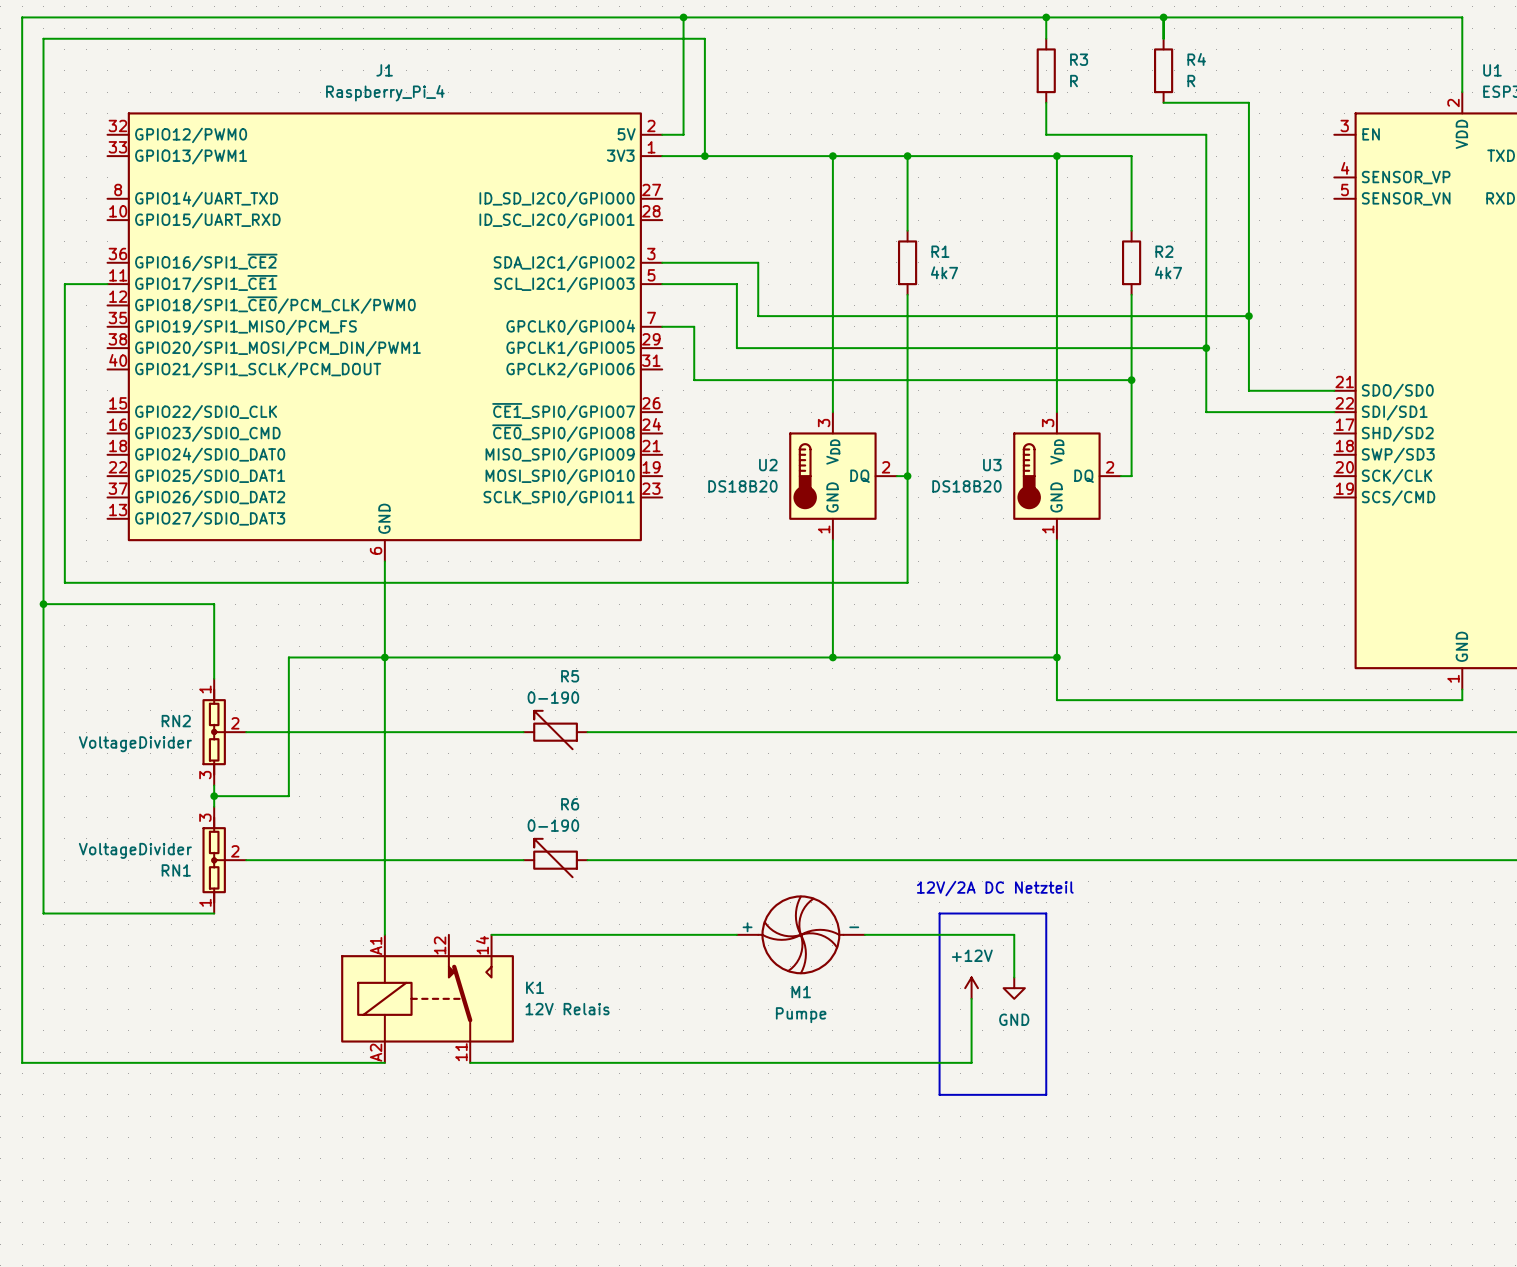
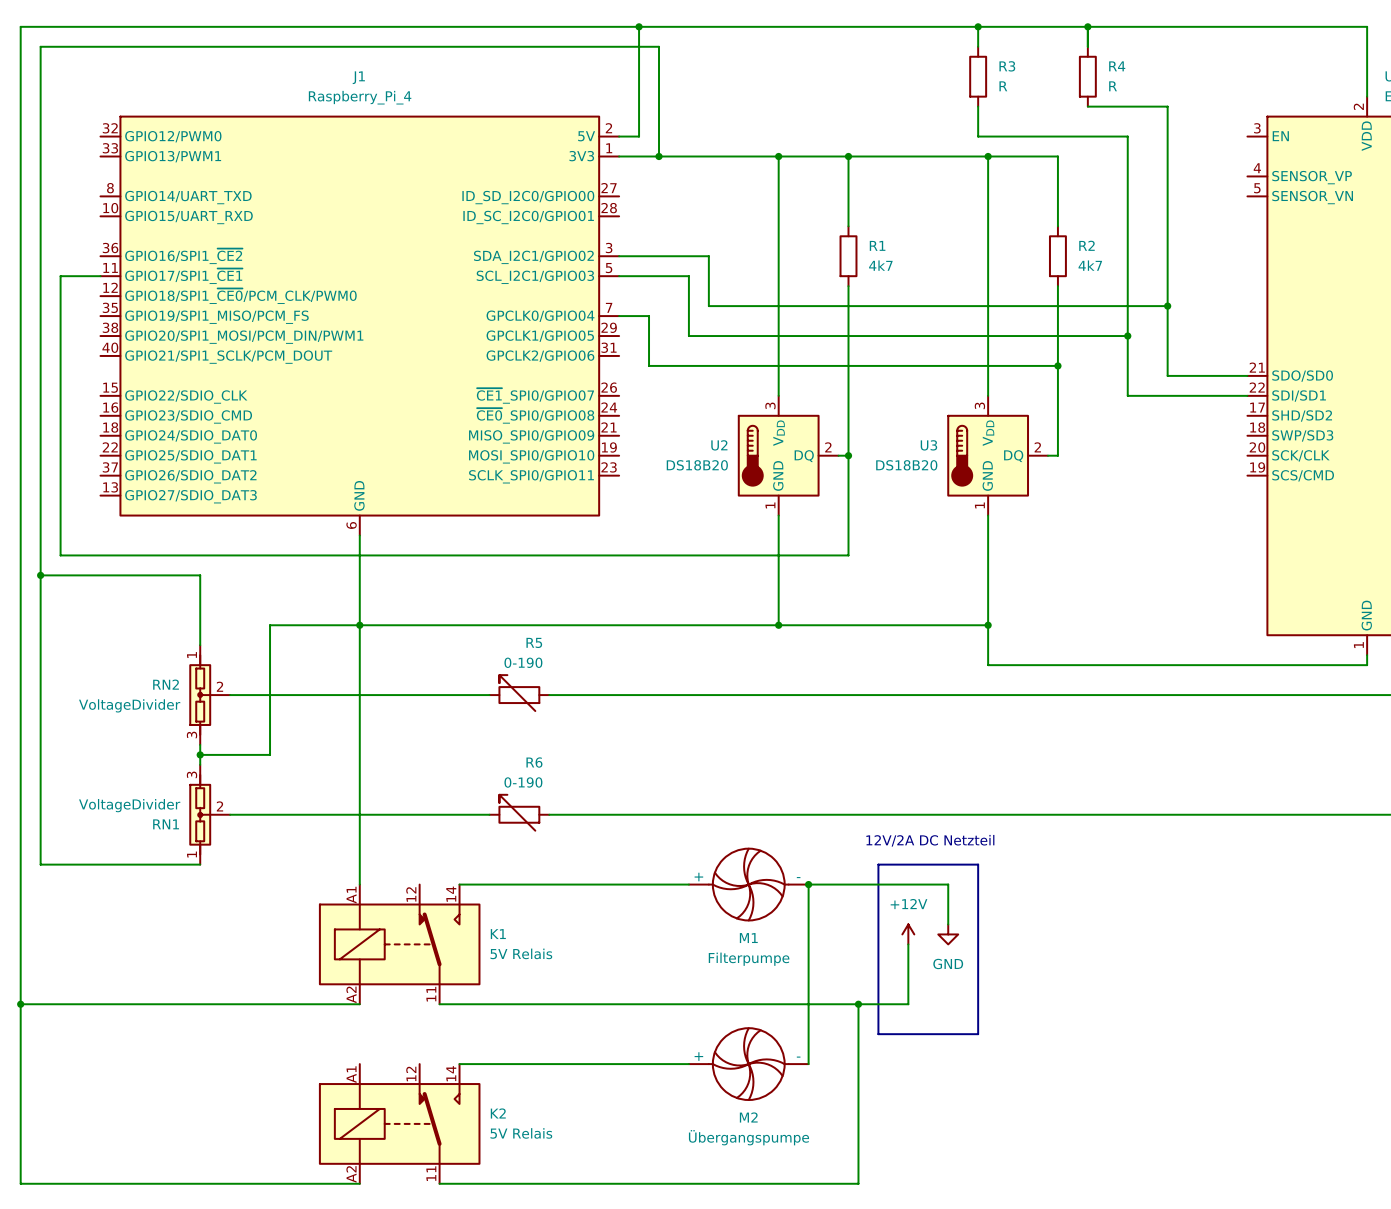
wire: none -> (808, 884) (808, 1064)
junction: none -> (808, 884)
K1 value: 12V Relais (567, 1009) -> 5V Relais (521, 953)
M1 value: Pumpe (801, 1015) -> Filterpumpe (749, 959)
wire: none -> (20, 1004) (20, 1183) (359, 1183)
junction: none -> (20, 1004)
wire: none -> (858, 1004) (858, 1183) (439, 1183)
junction: none -> (858, 1004)
wire: none -> (459, 1064) (688, 1064)
M2: none -> Übergangspumpe (748, 1064)
K2: none -> 5V Relais (399, 1123)

